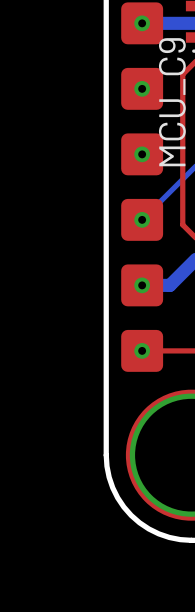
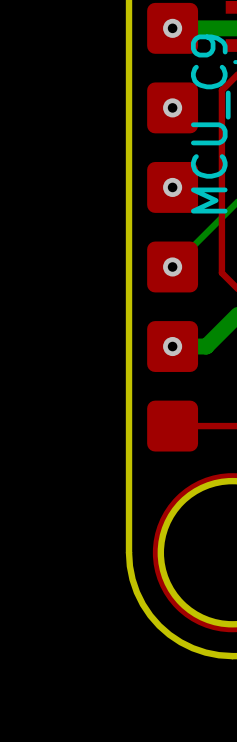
via: (142, 350) -> none

